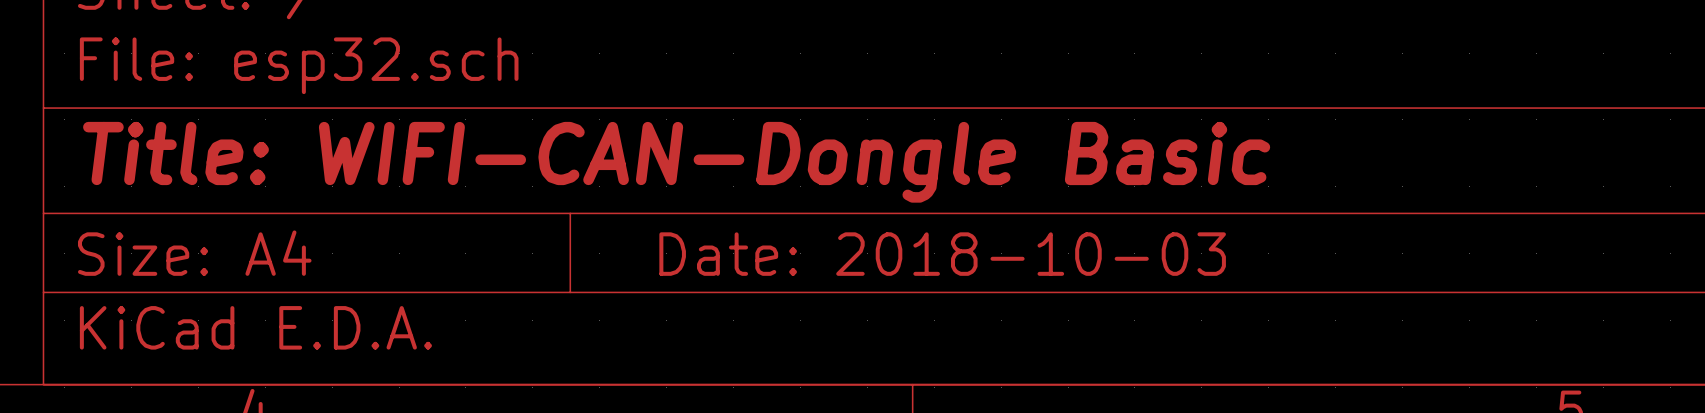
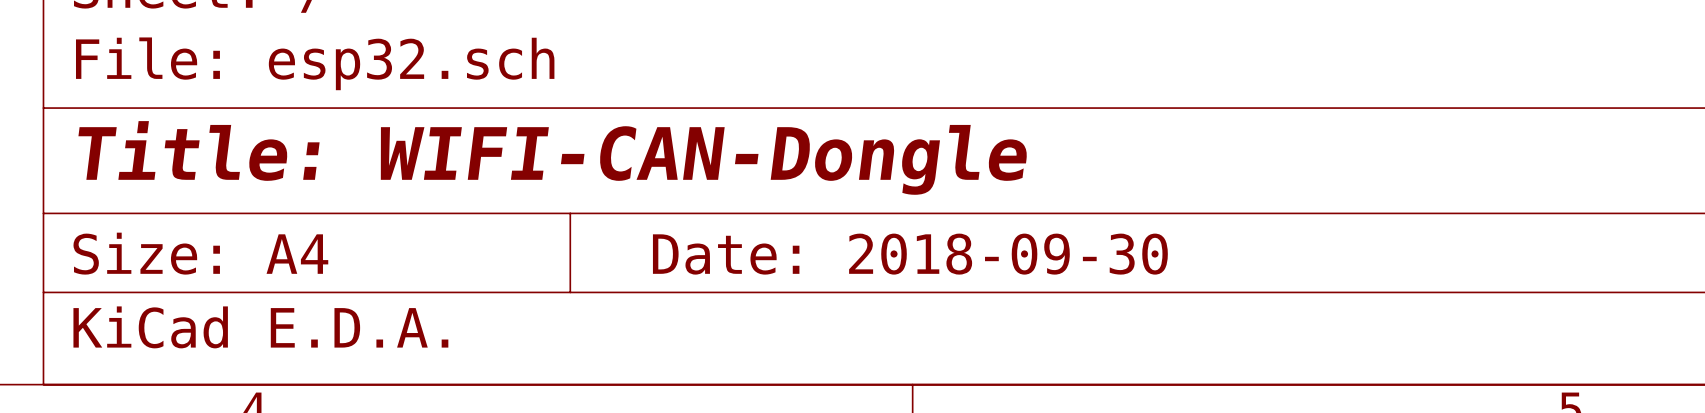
title block: Title: WIFI-CAN-Dongle Basic (676, 162) -> Title: WIFI-CAN-Dongle (553, 157)
title block: Date: 2018-10-03 (942, 254) -> Date: 2018-09-30 (910, 254)

